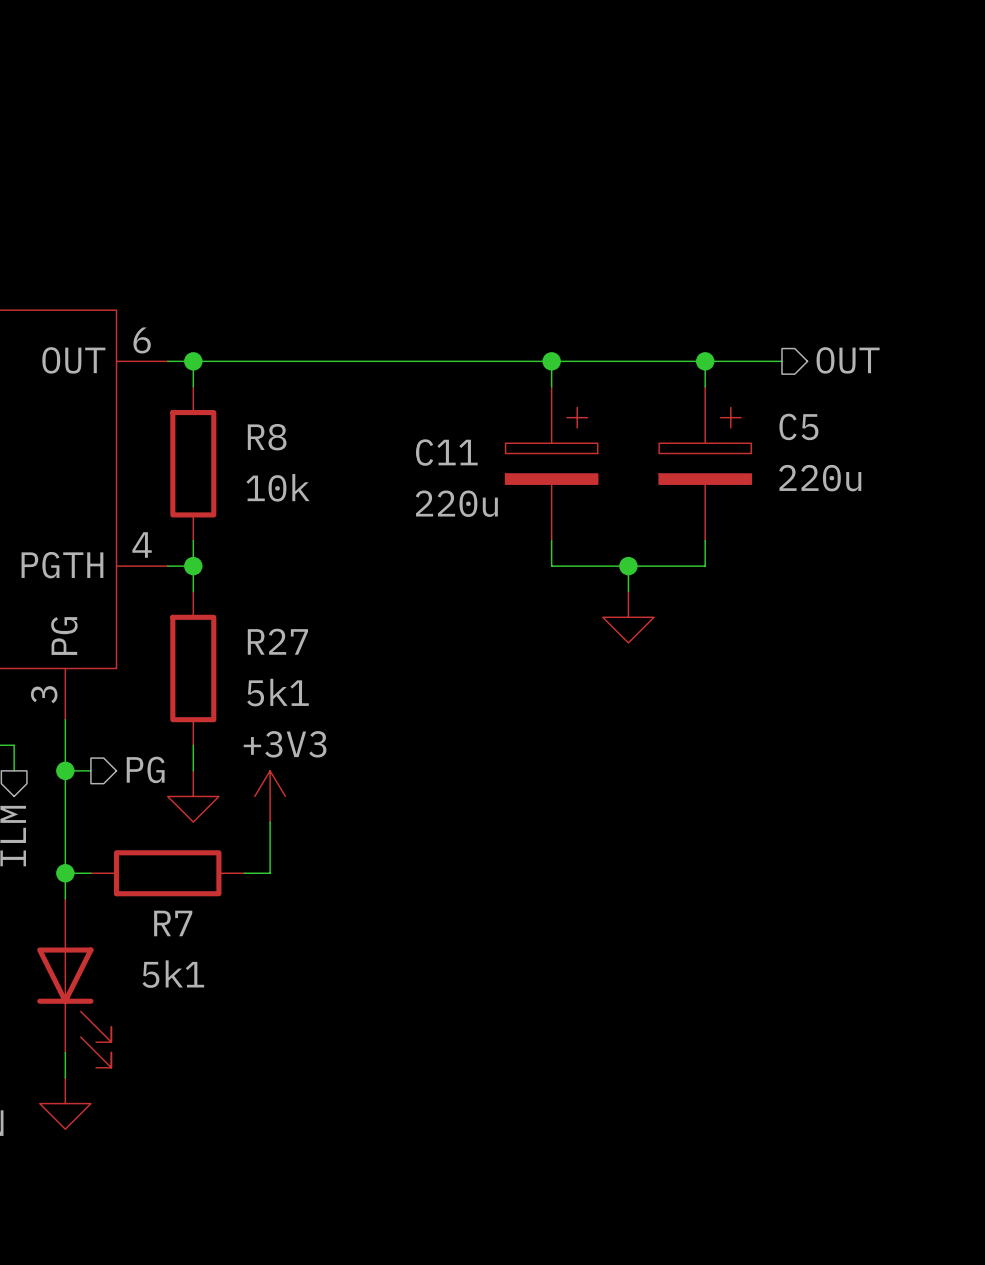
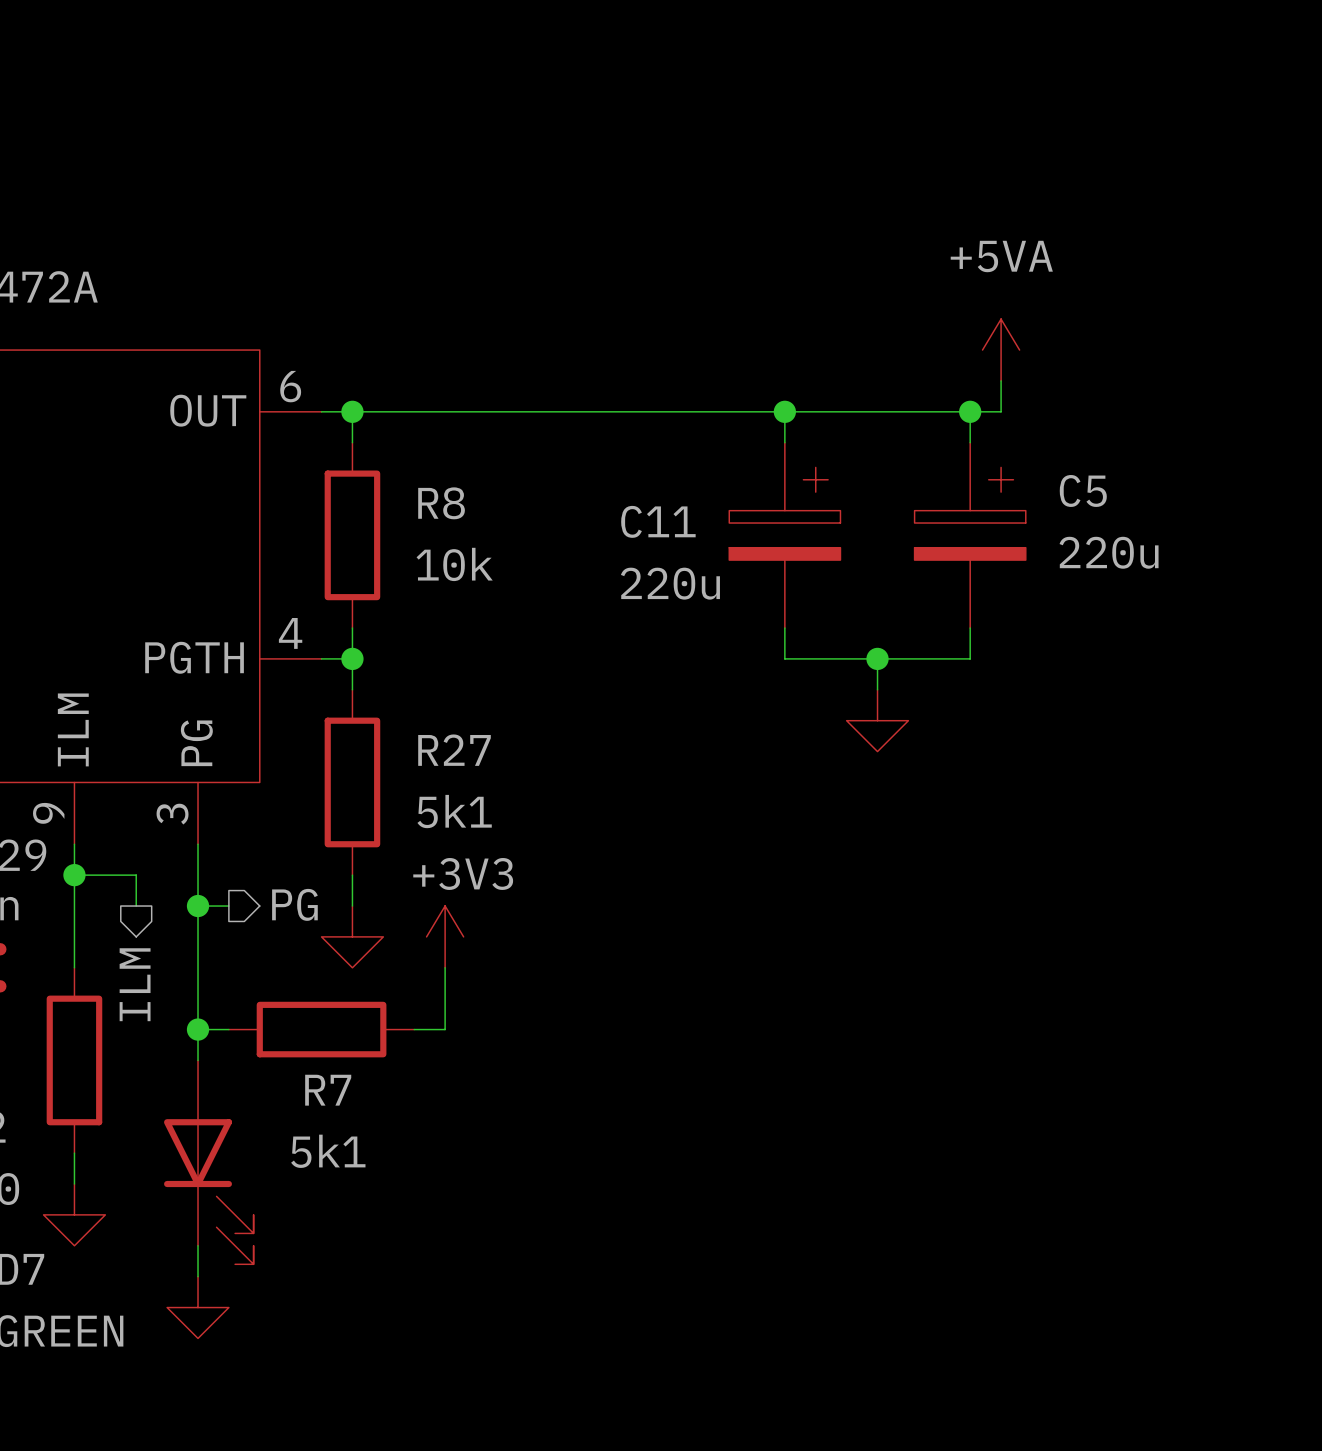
power symbol: none -> +5VA (1001, 350)
hierarchical label: OUT (848, 360) -> none
wire: (730, 361) (781, 361) -> (1001, 411) (1001, 380)

